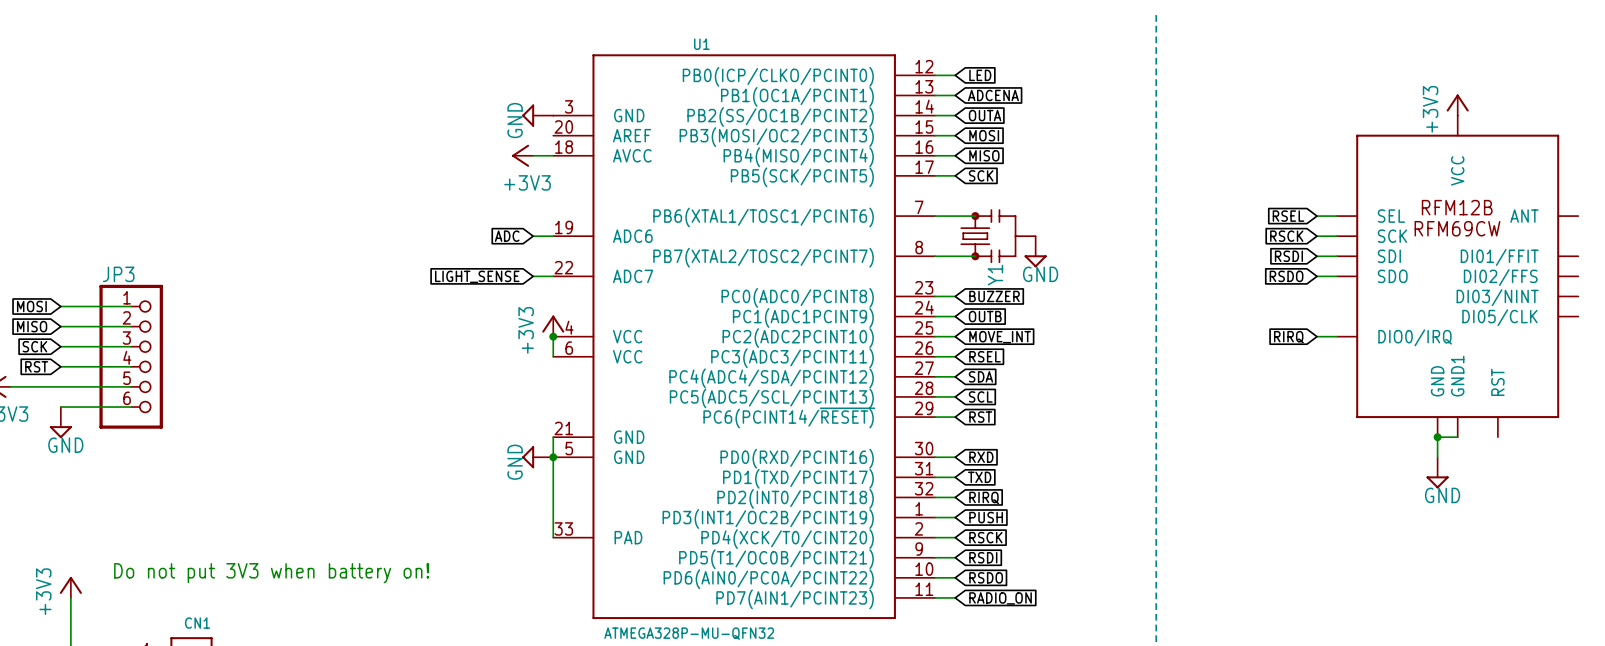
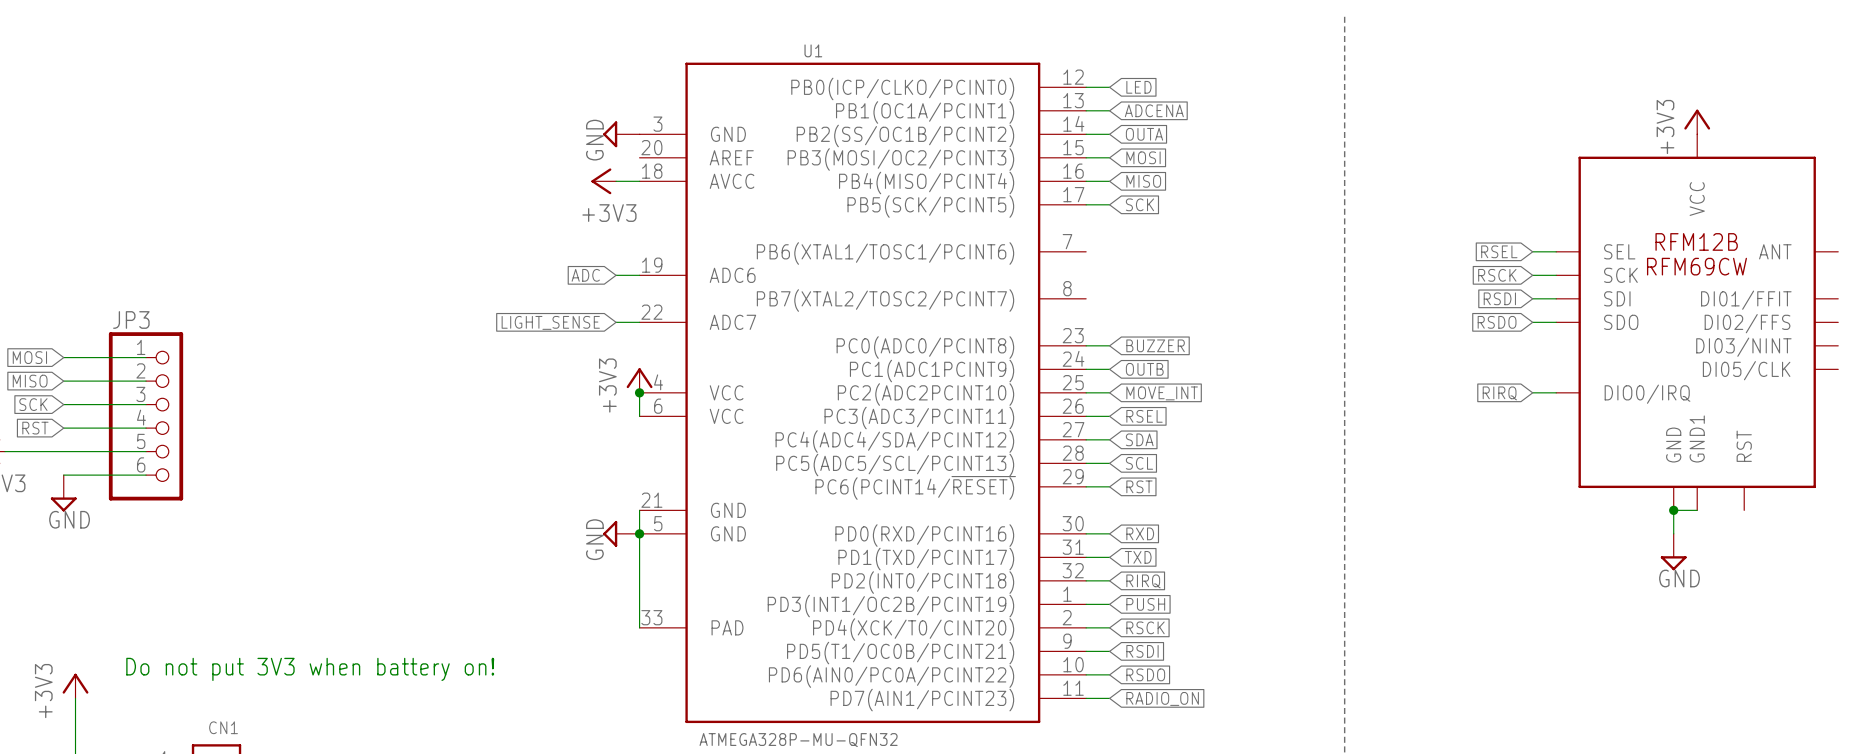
wire: (935, 216) (975, 216) -> none
Y1: (998, 236) -> none
power symbol: GND (1035, 251) -> none
wire: (935, 256) (975, 256) -> none

